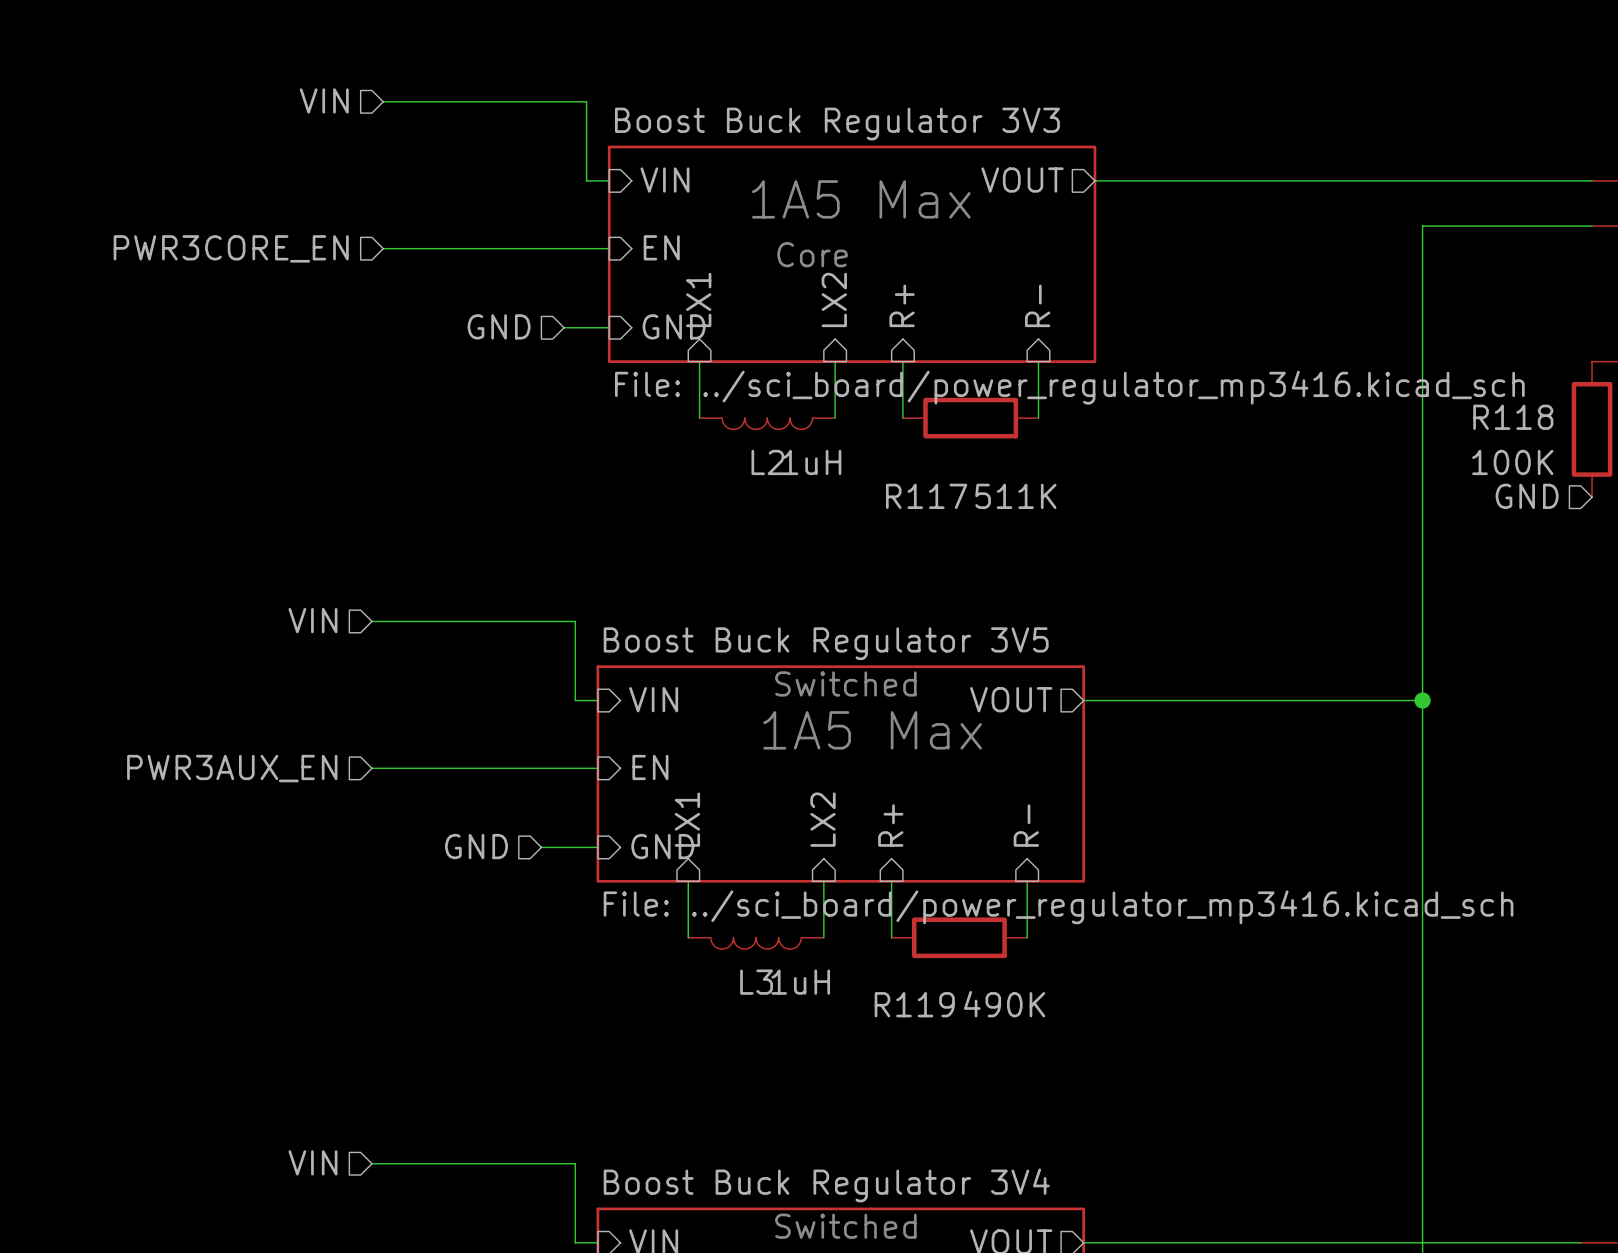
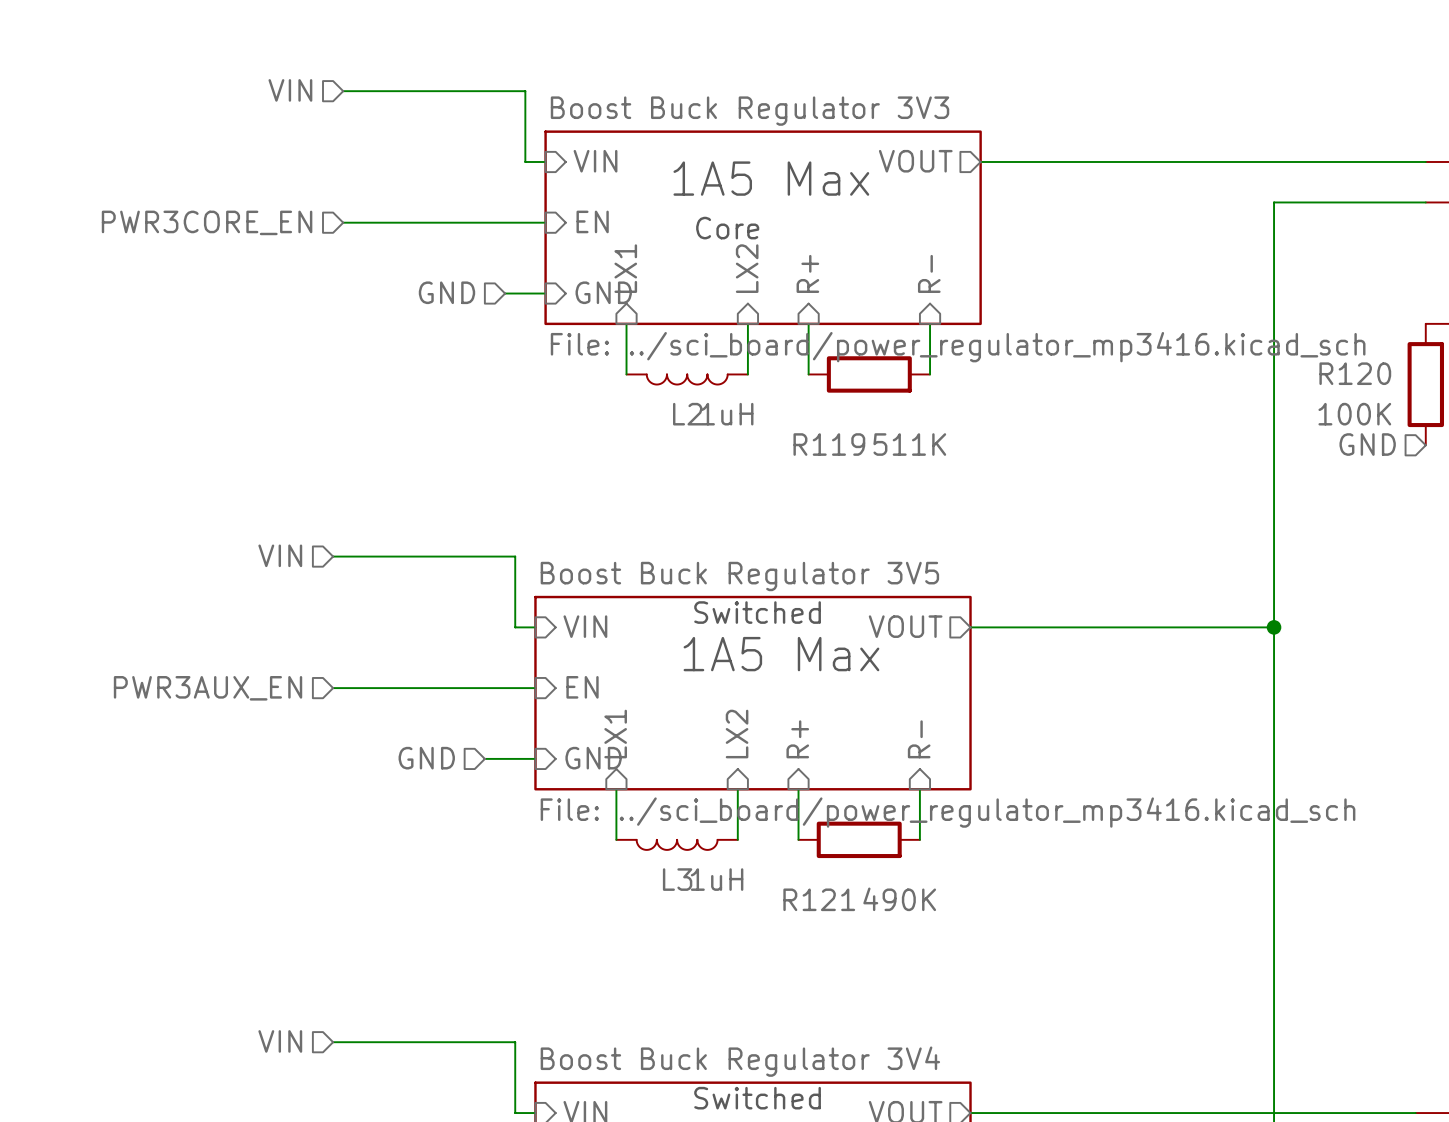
R118 name: R118 (1513, 417) -> R120 (1355, 373)
R117 name: R117 (926, 496) -> R119 (829, 444)
R119 name: R119 (914, 1004) -> R121 (819, 899)

